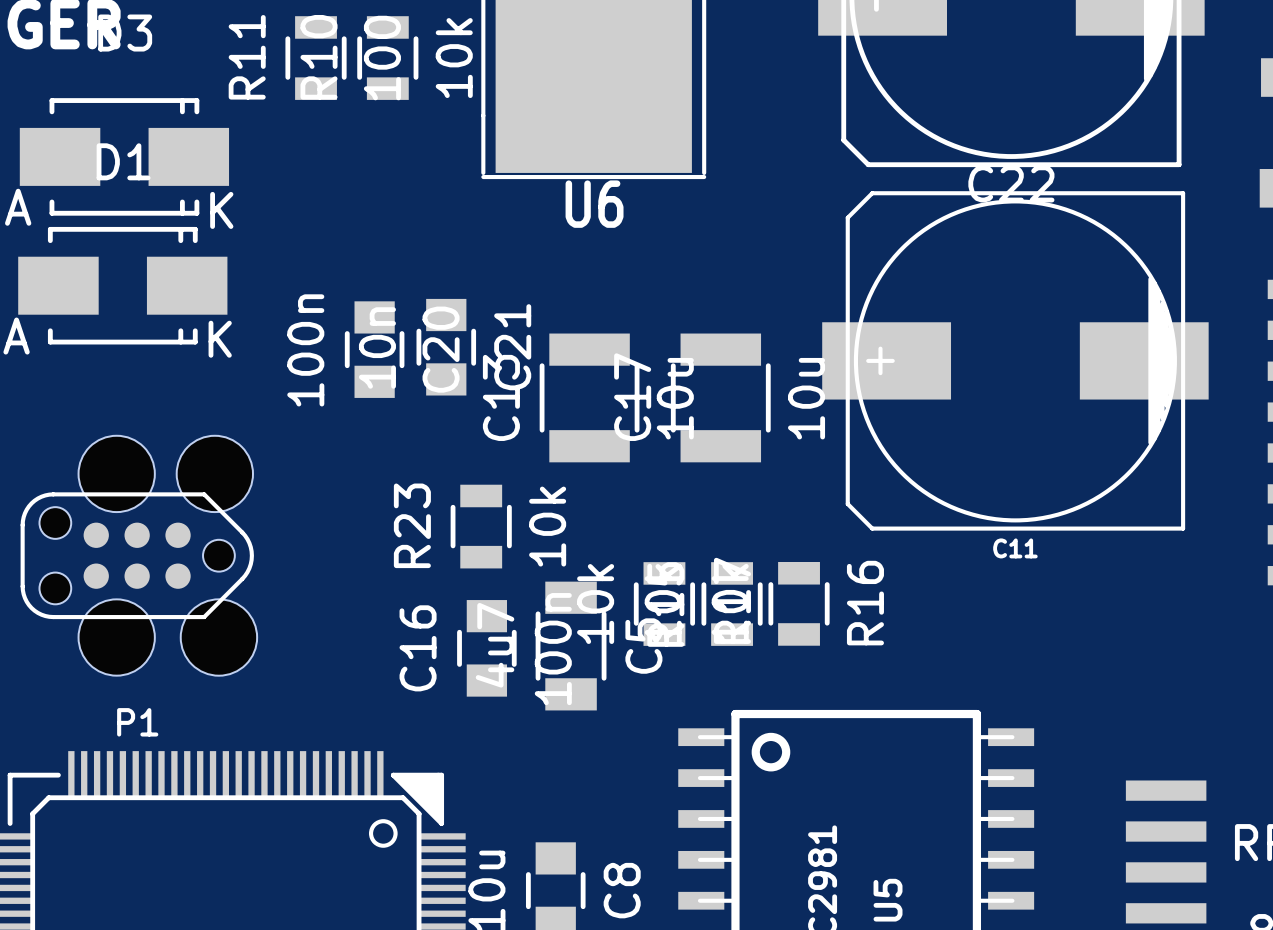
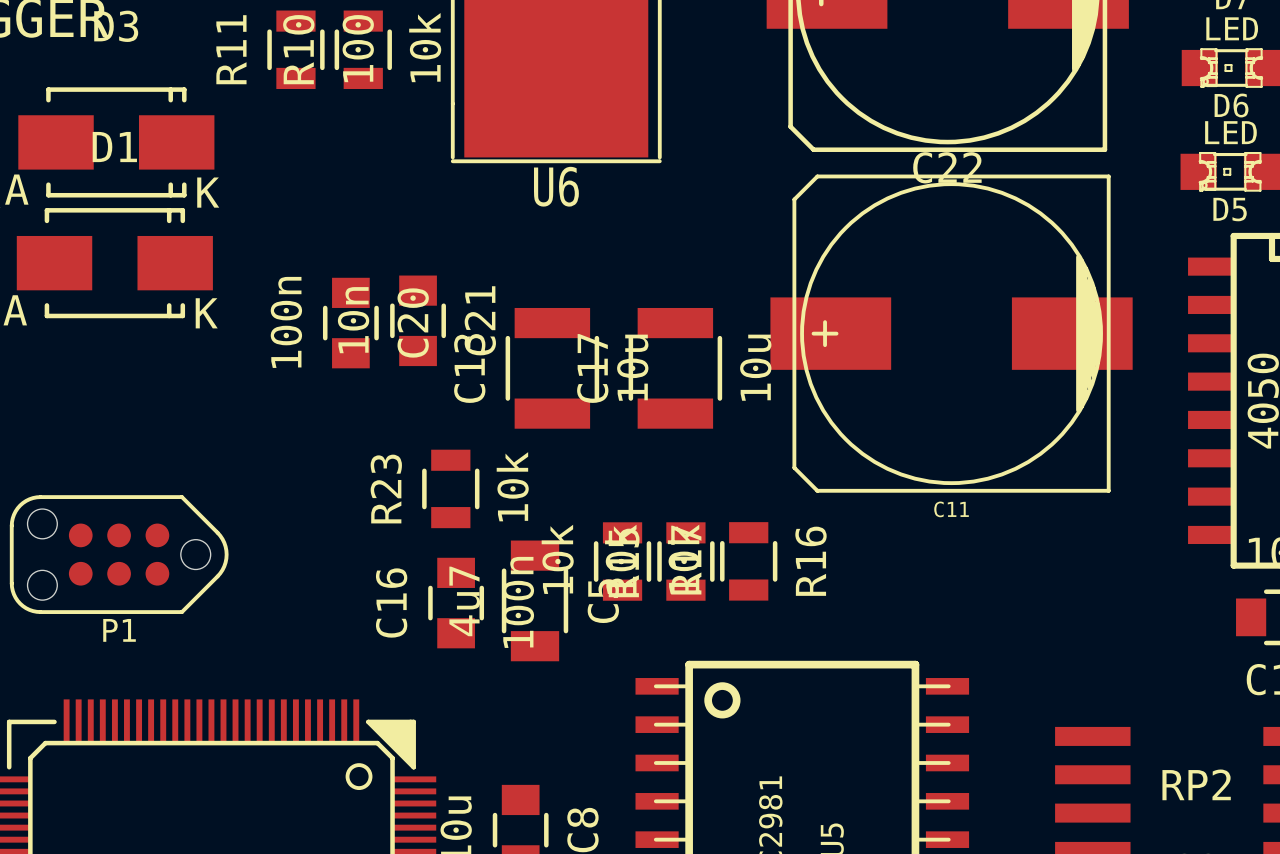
P1 footprint: [20, 435, 258, 676] -> [9, 495, 229, 614]
P1 name position: P1 (137, 722) -> P1 (119, 630)

